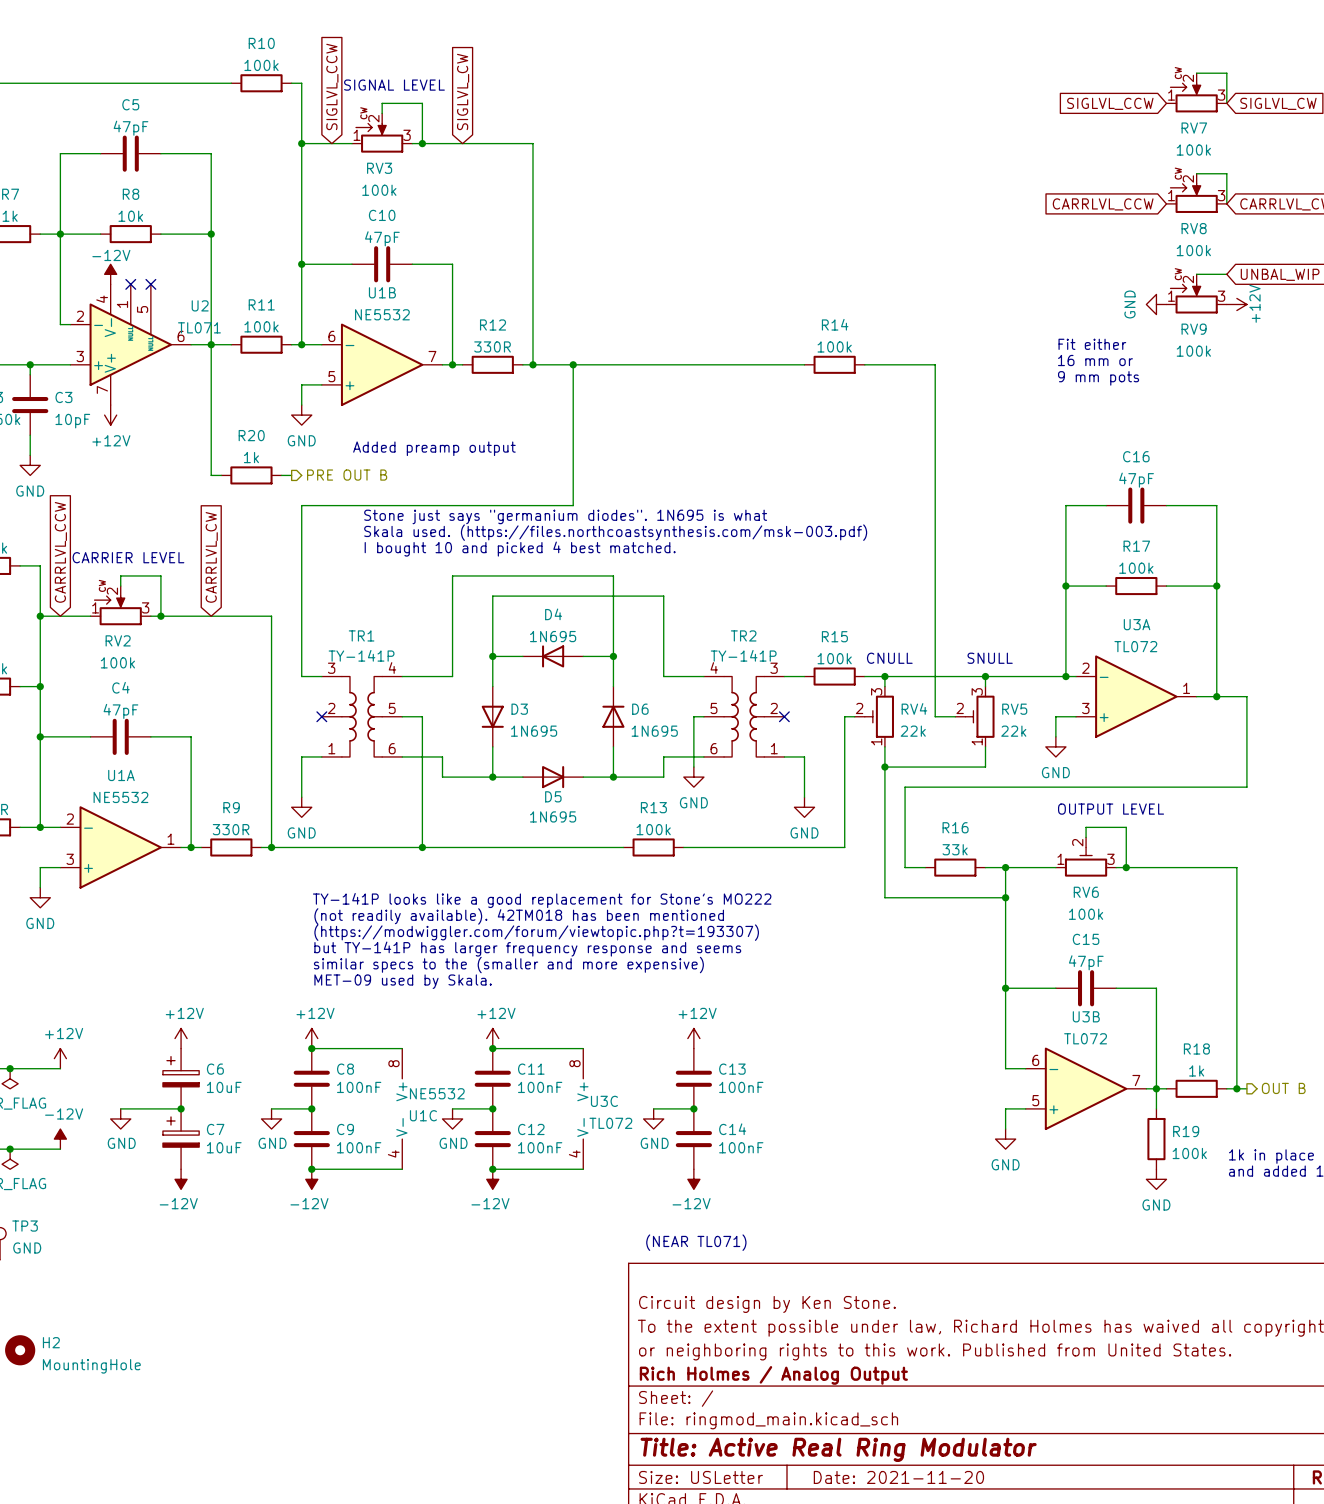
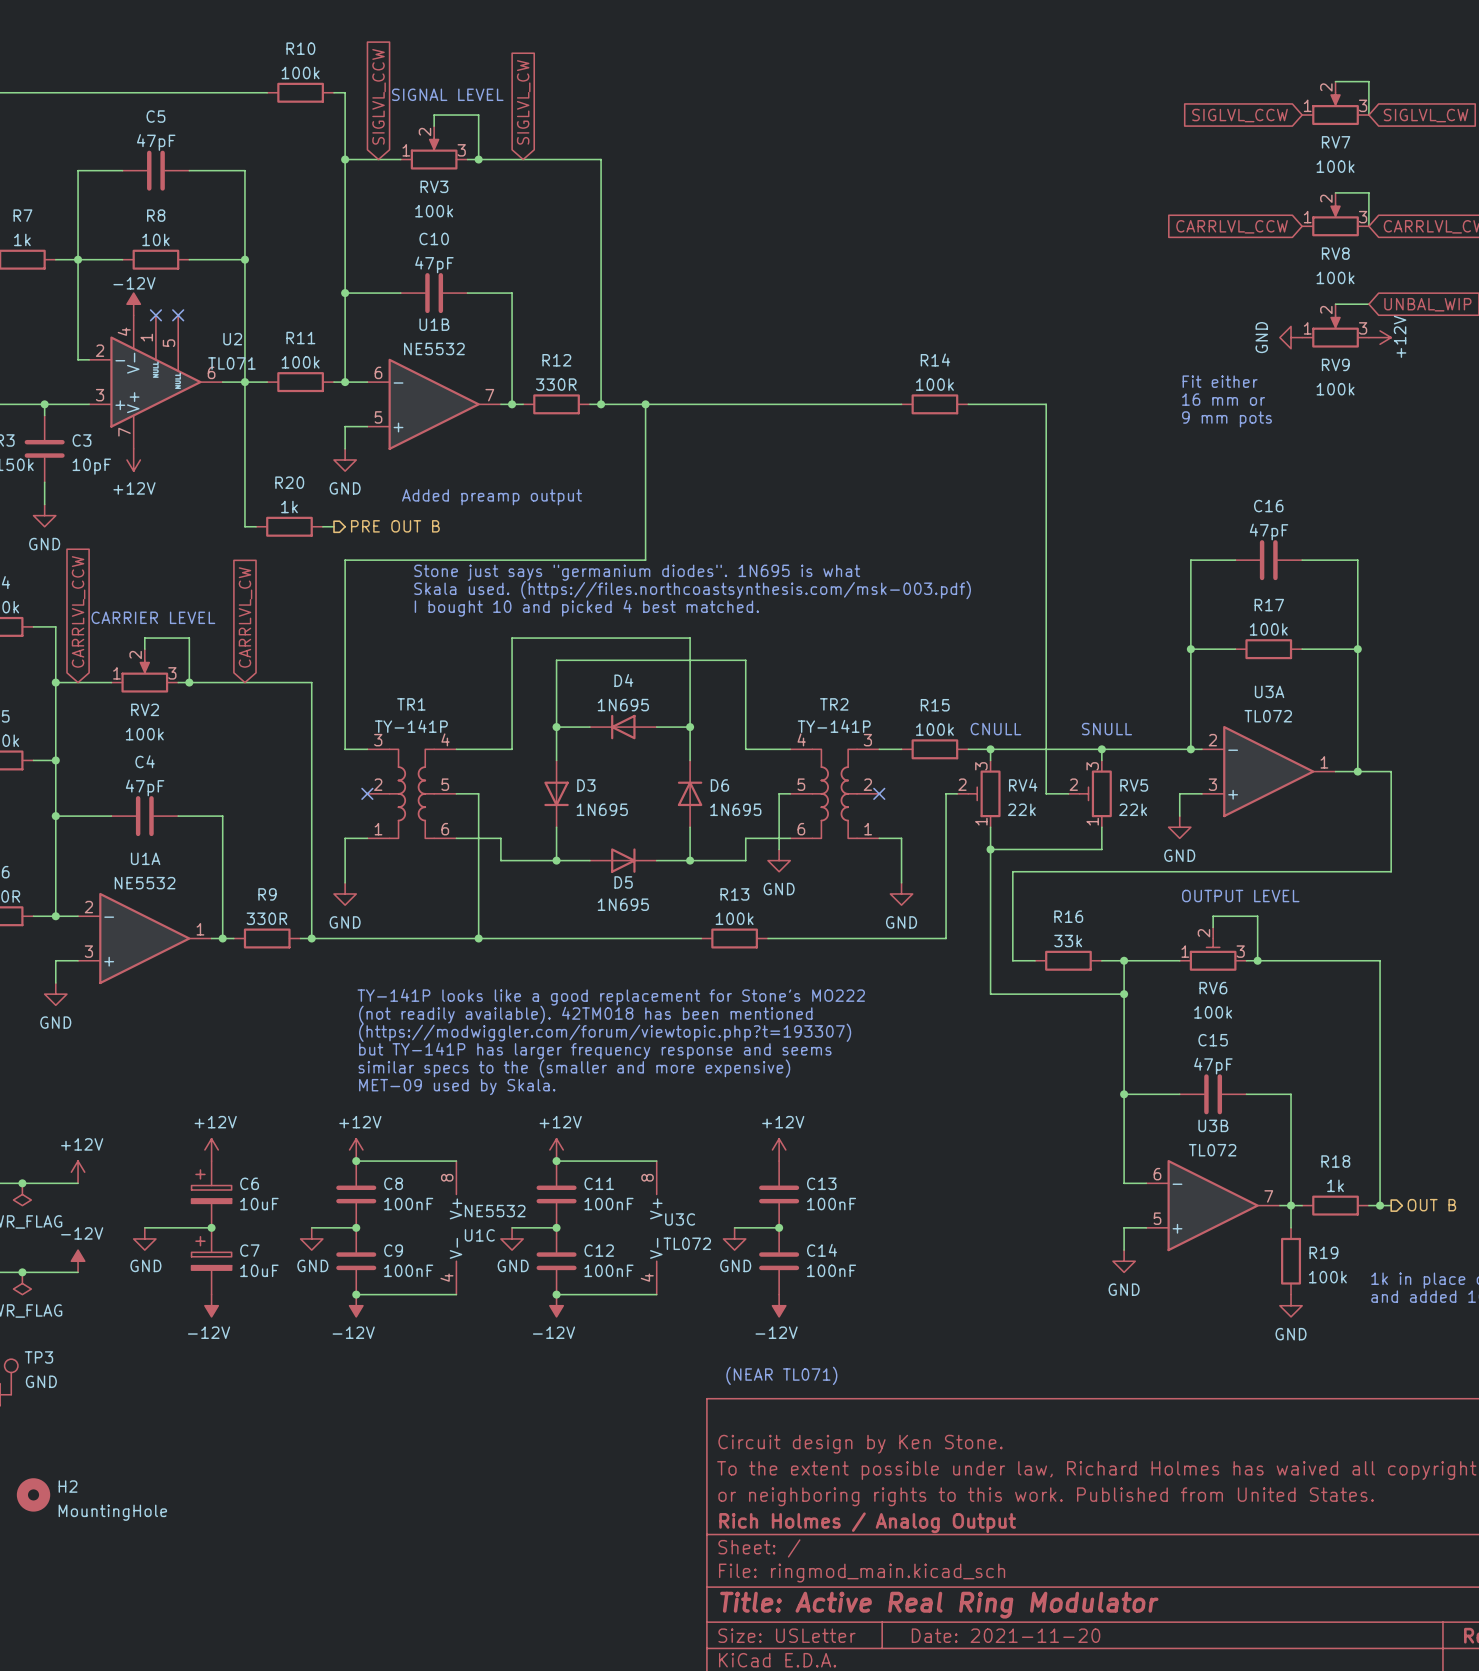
RV7 symbol: [1166, 73, 1227, 113] -> [1302, 81, 1369, 126]
RV3 symbol: [351, 113, 413, 153] -> [400, 126, 468, 170]
RV8 symbol: [1166, 173, 1227, 213] -> [1302, 192, 1369, 237]
RV9 symbol: [1166, 274, 1227, 314] -> [1302, 304, 1369, 348]
RV2 symbol: [90, 586, 151, 626] -> [111, 649, 179, 693]

